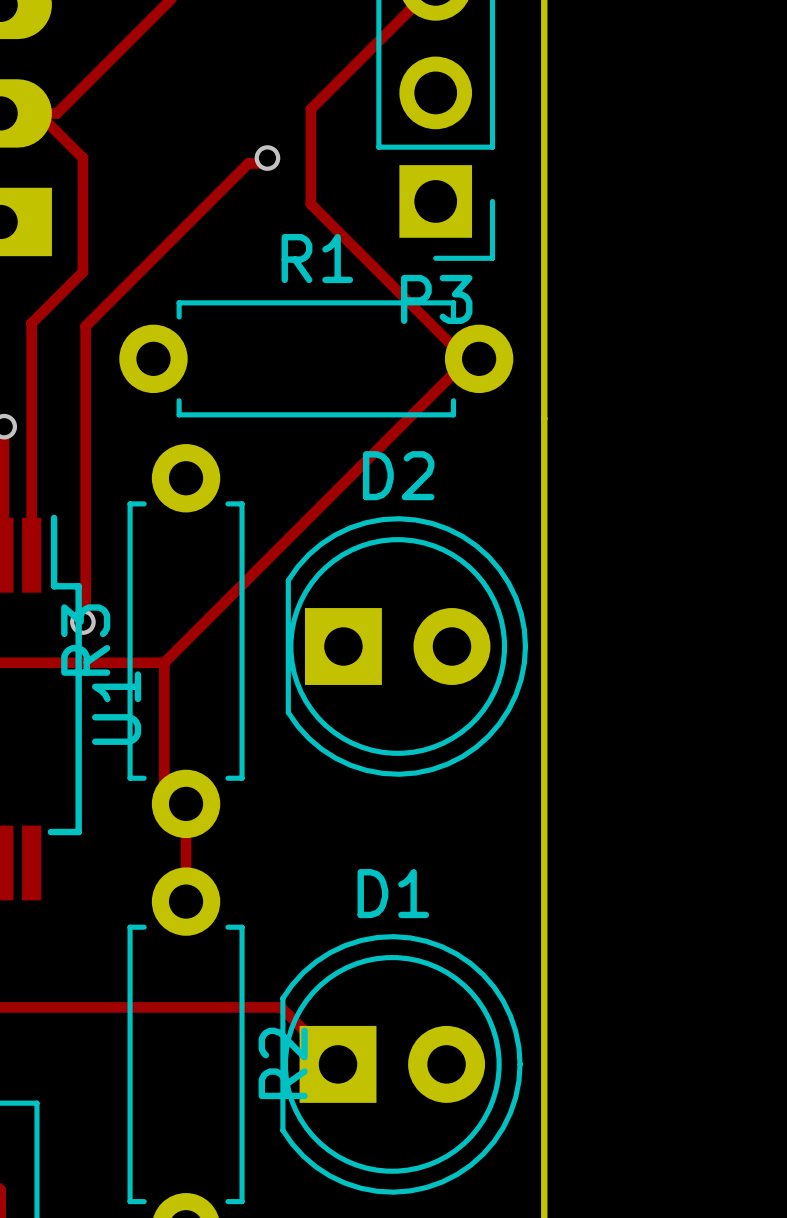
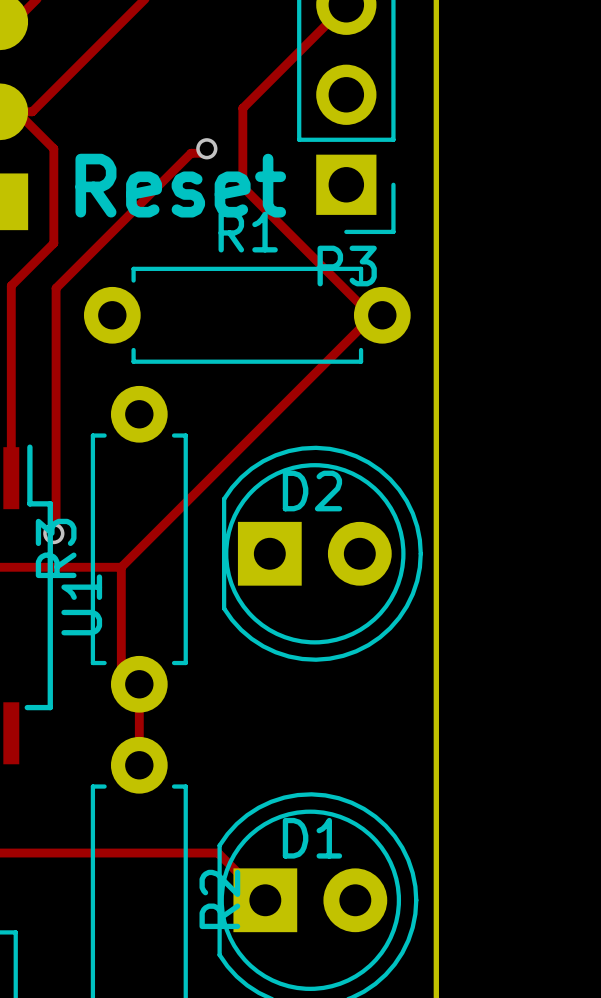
text: none -> Reset (180, 185)
D2 name position: D2 (398, 475) -> D2 (312, 491)
D1 name position: D1 (393, 893) -> D1 (312, 838)

